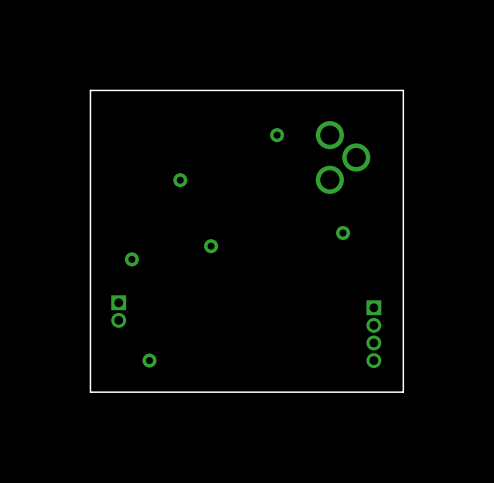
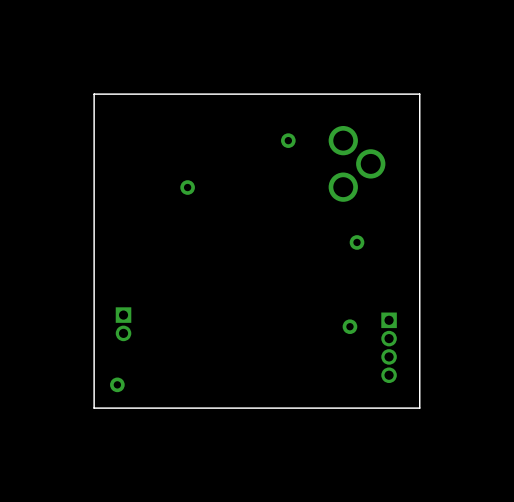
via: (211, 246) -> none
via: (131, 259) -> none
via: none -> (349, 326)
via position: (149, 360) -> (117, 384)

